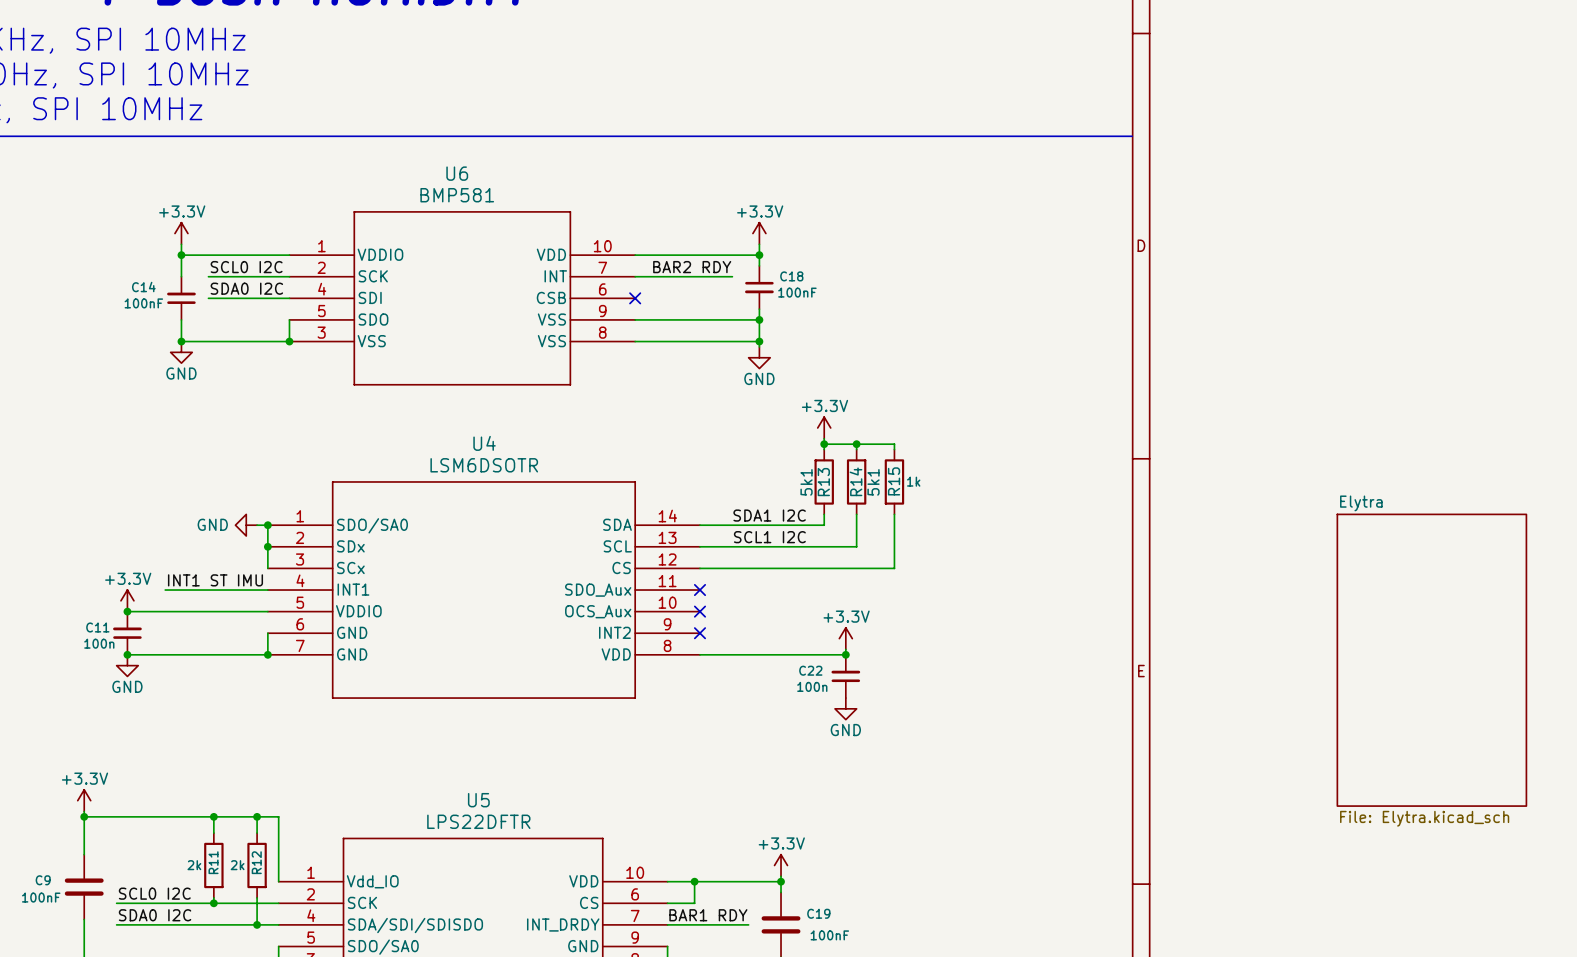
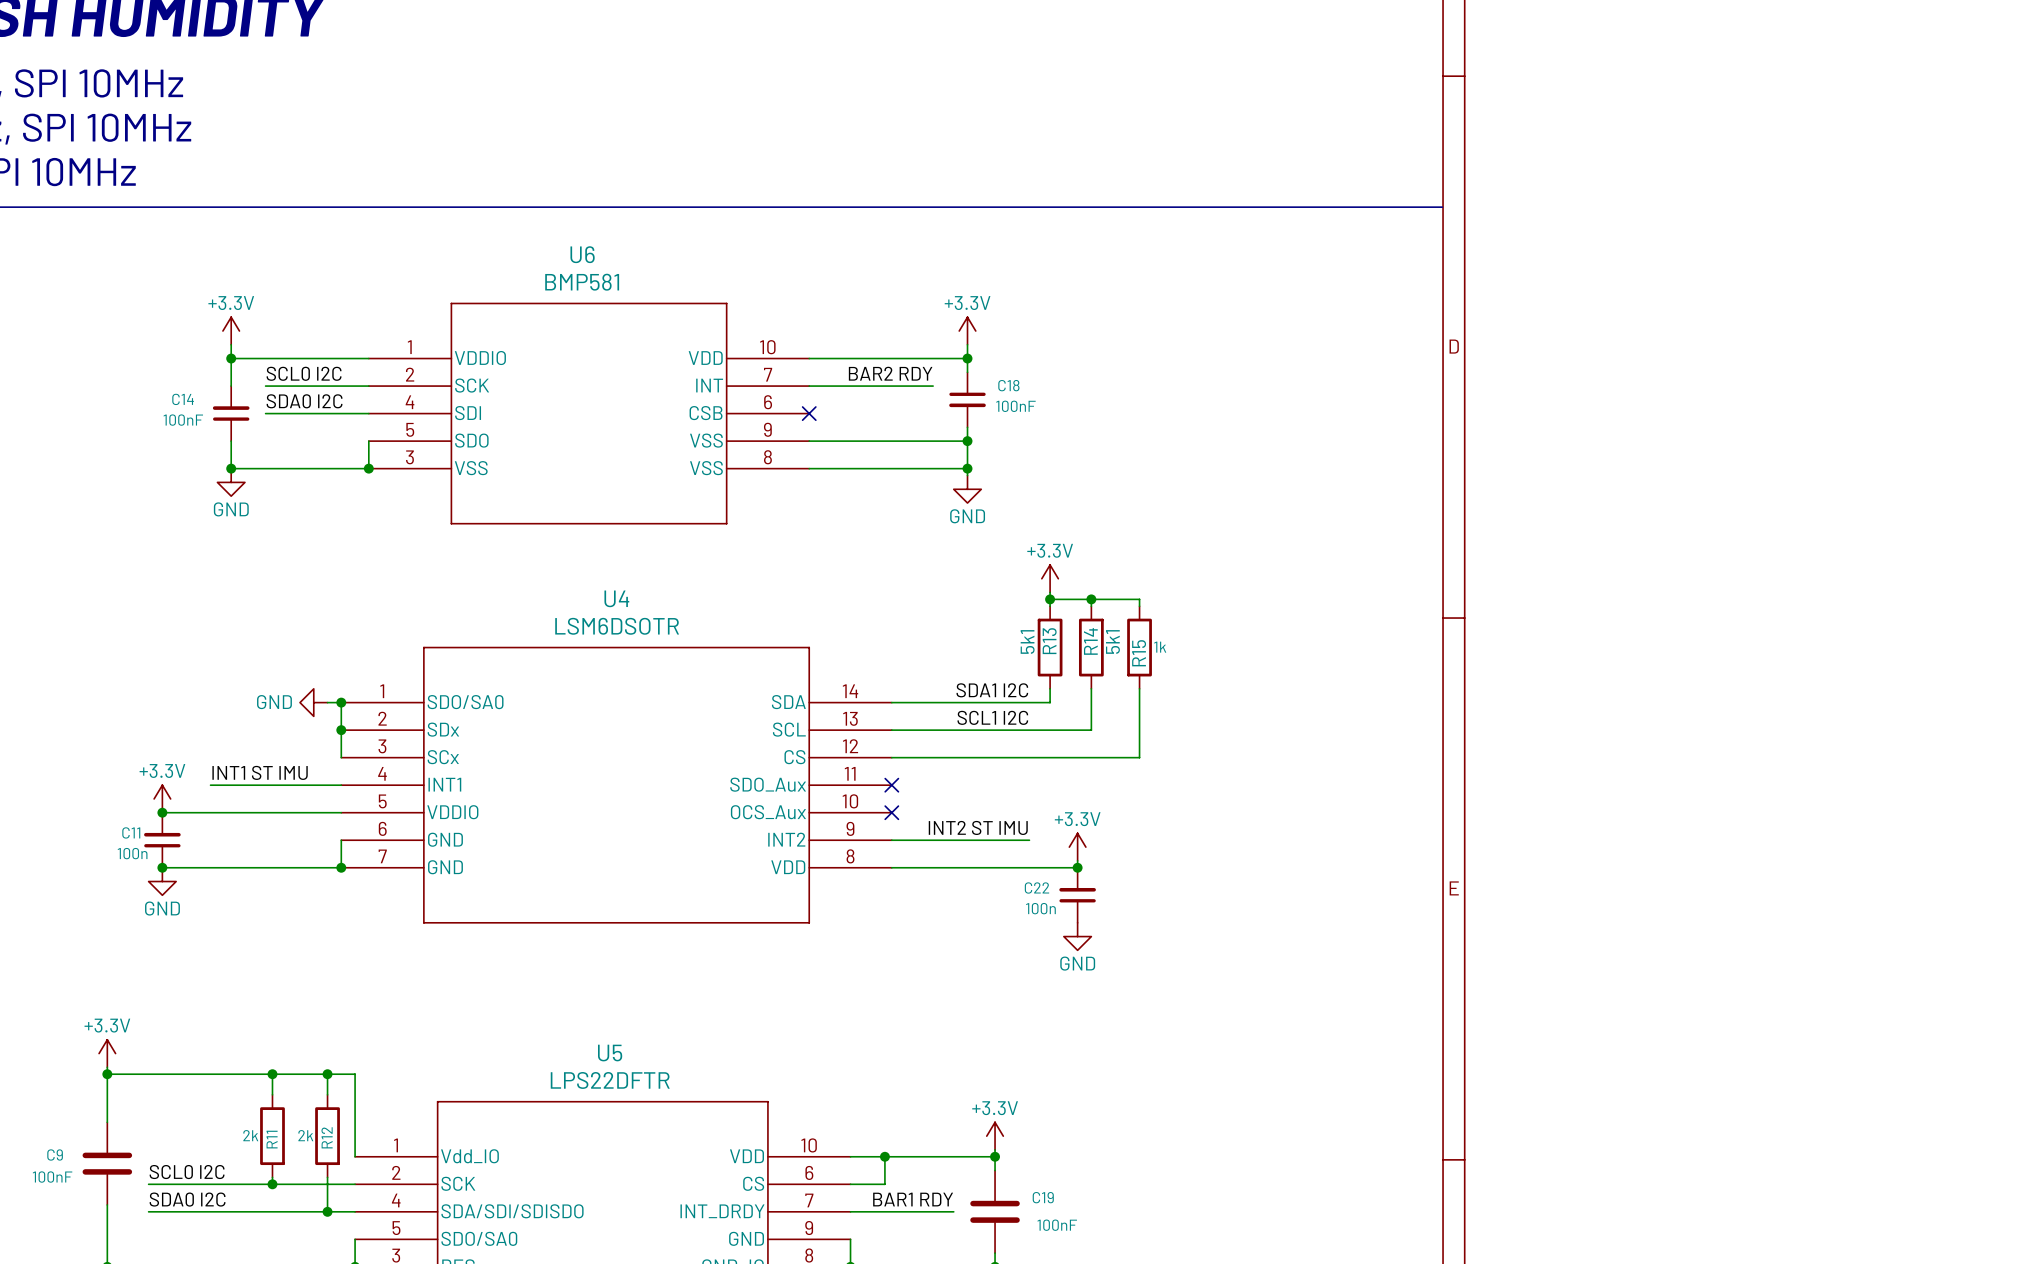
label: none -> INT2 ST IMU (978, 827)
wire: none -> (891, 840) (1029, 840)
no-connect mark: (699, 633) -> none
sheet Elytra: File: Elytra.kicad_sch (1431, 660) -> none

